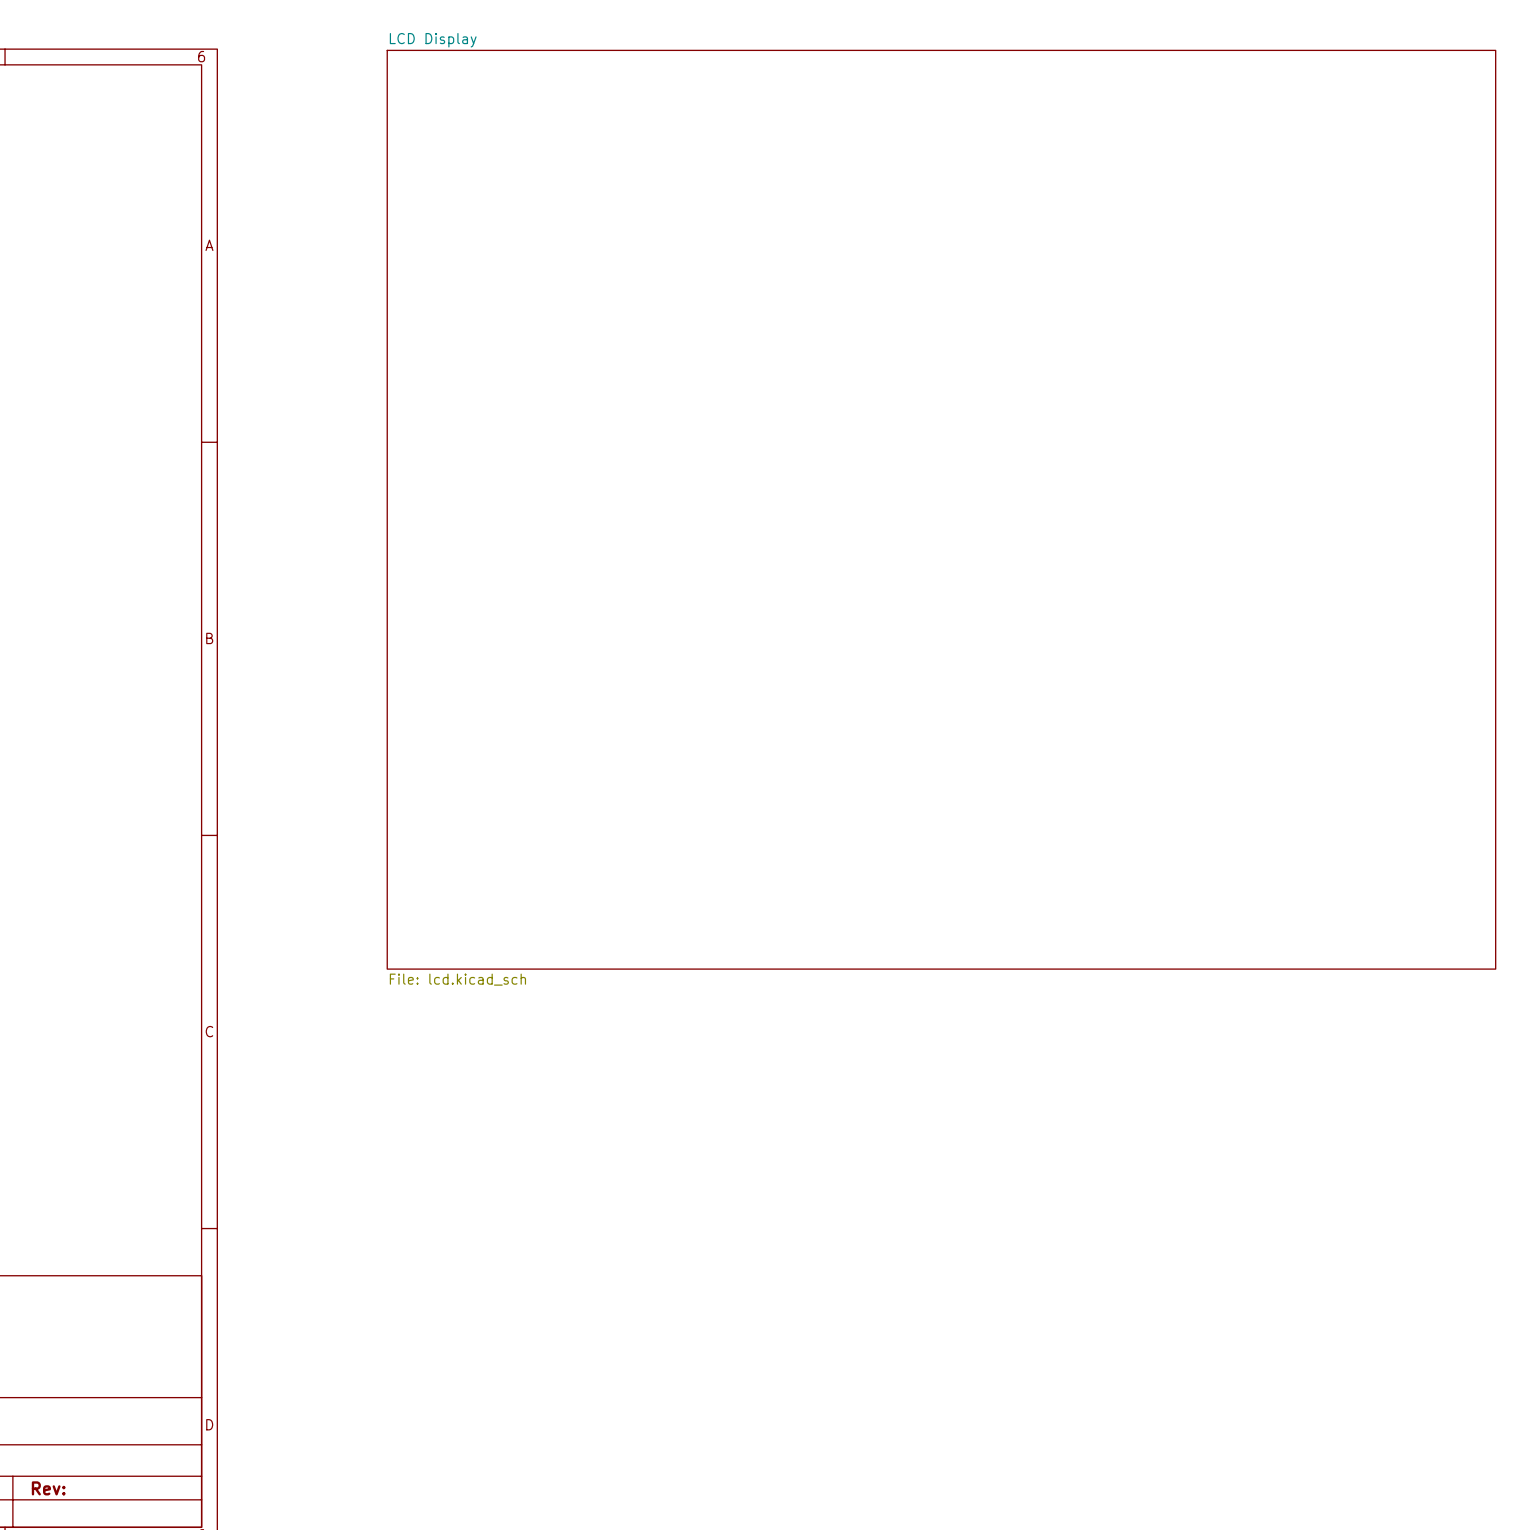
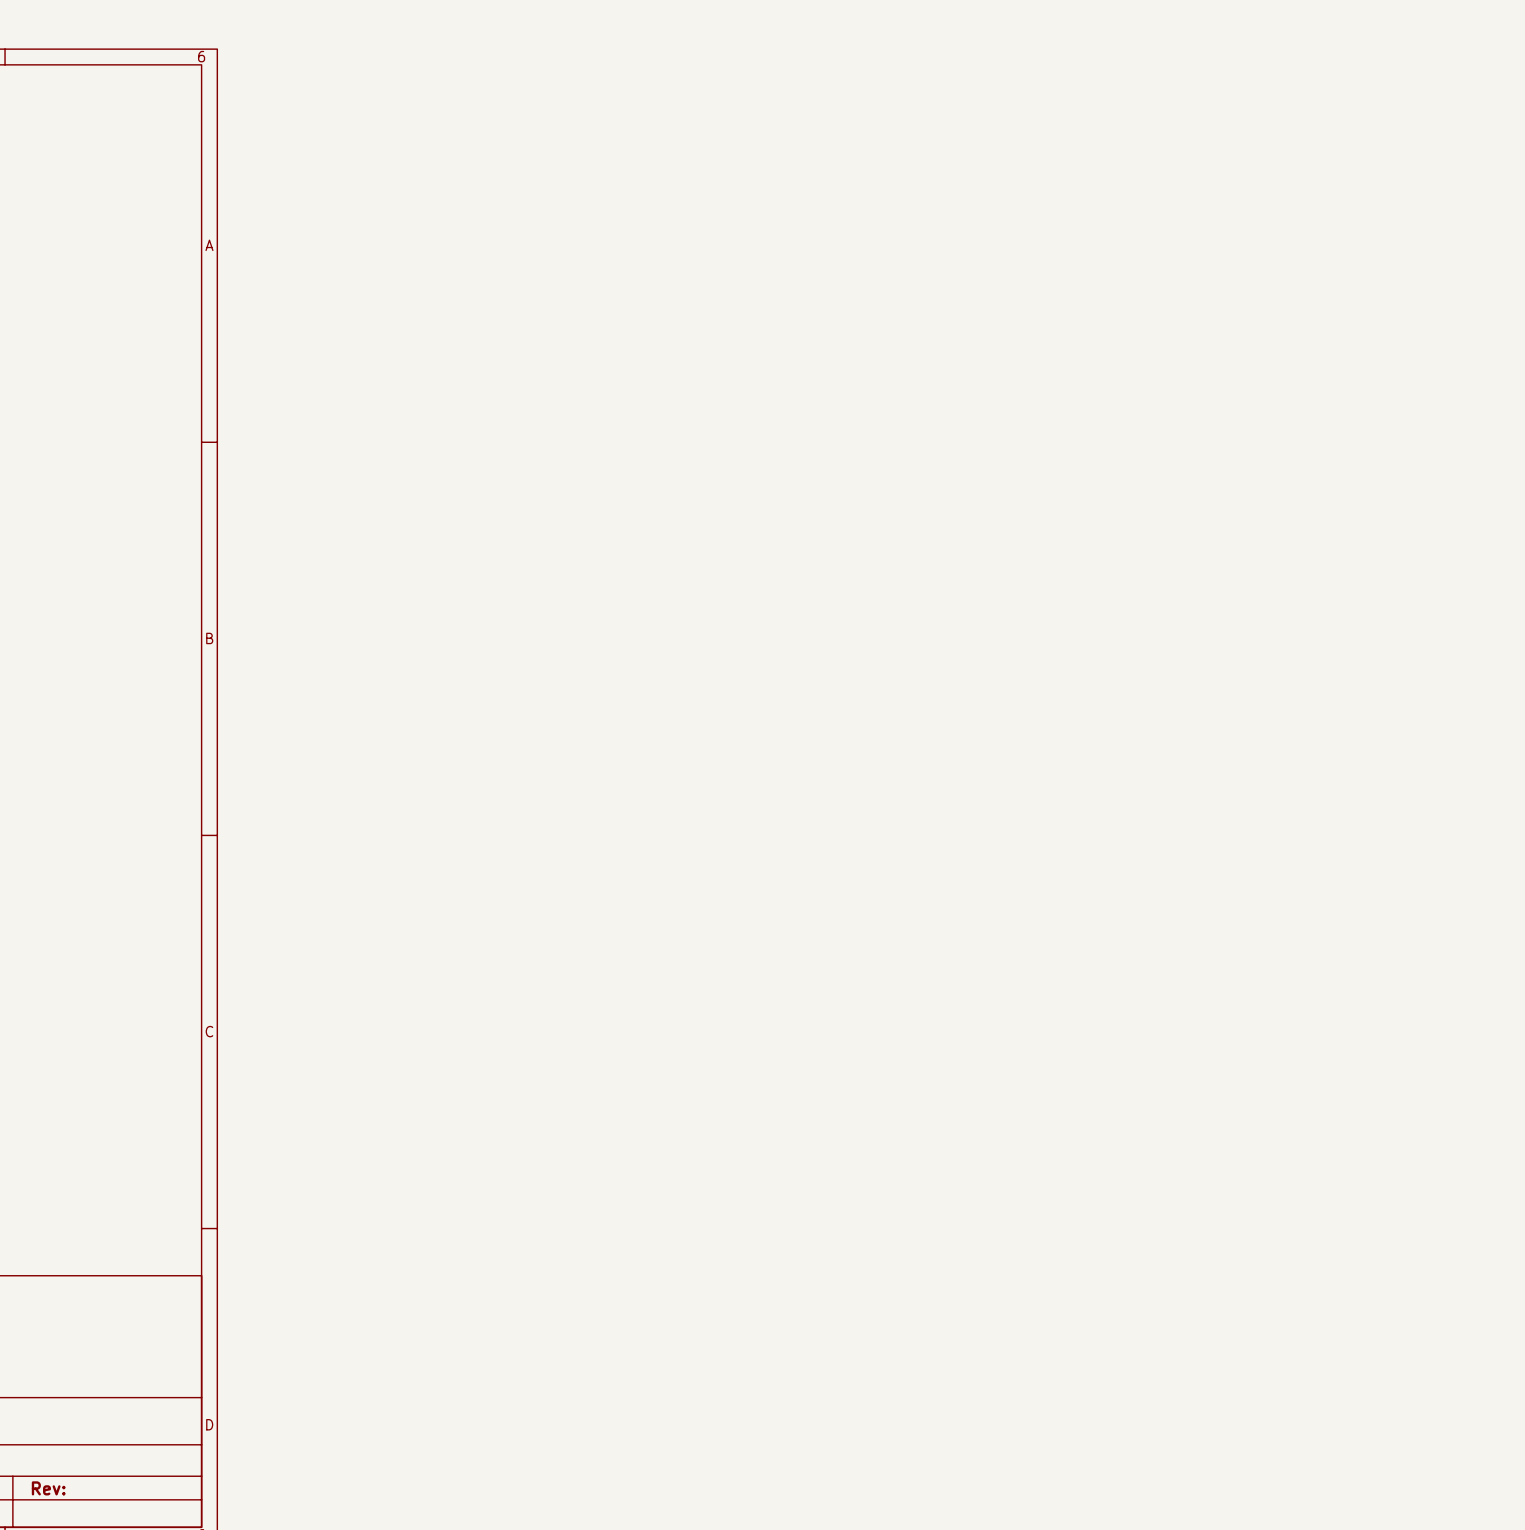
sheet LCD Display: File: lcd.kicad_sch (941, 509) -> none

